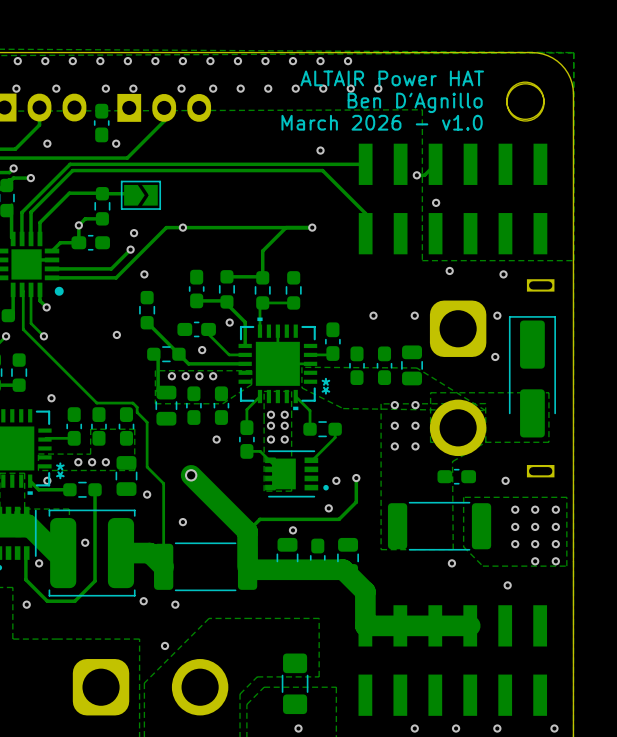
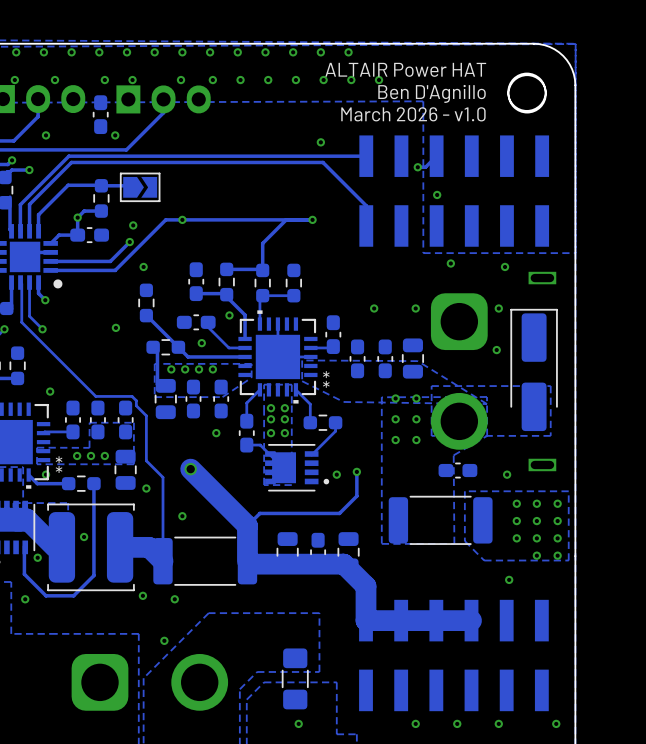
via: (328, 508) -> none
via: (293, 530) -> none
via: (451, 563) -> none

